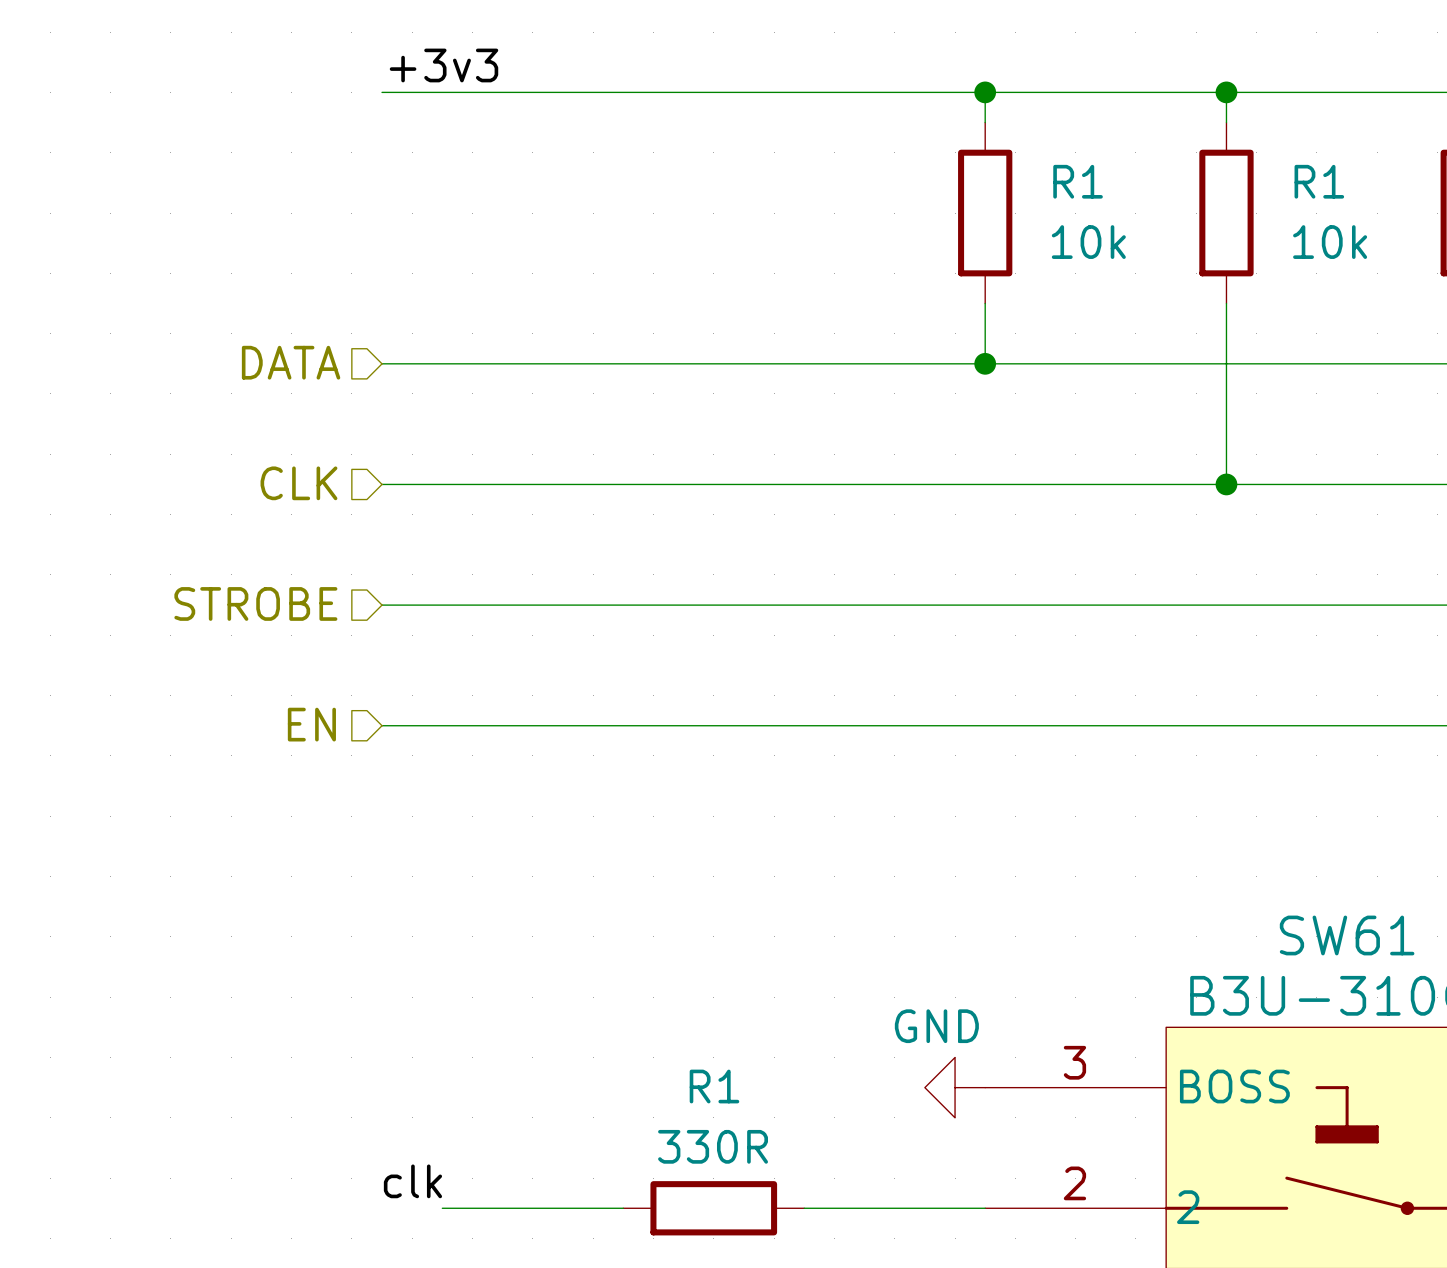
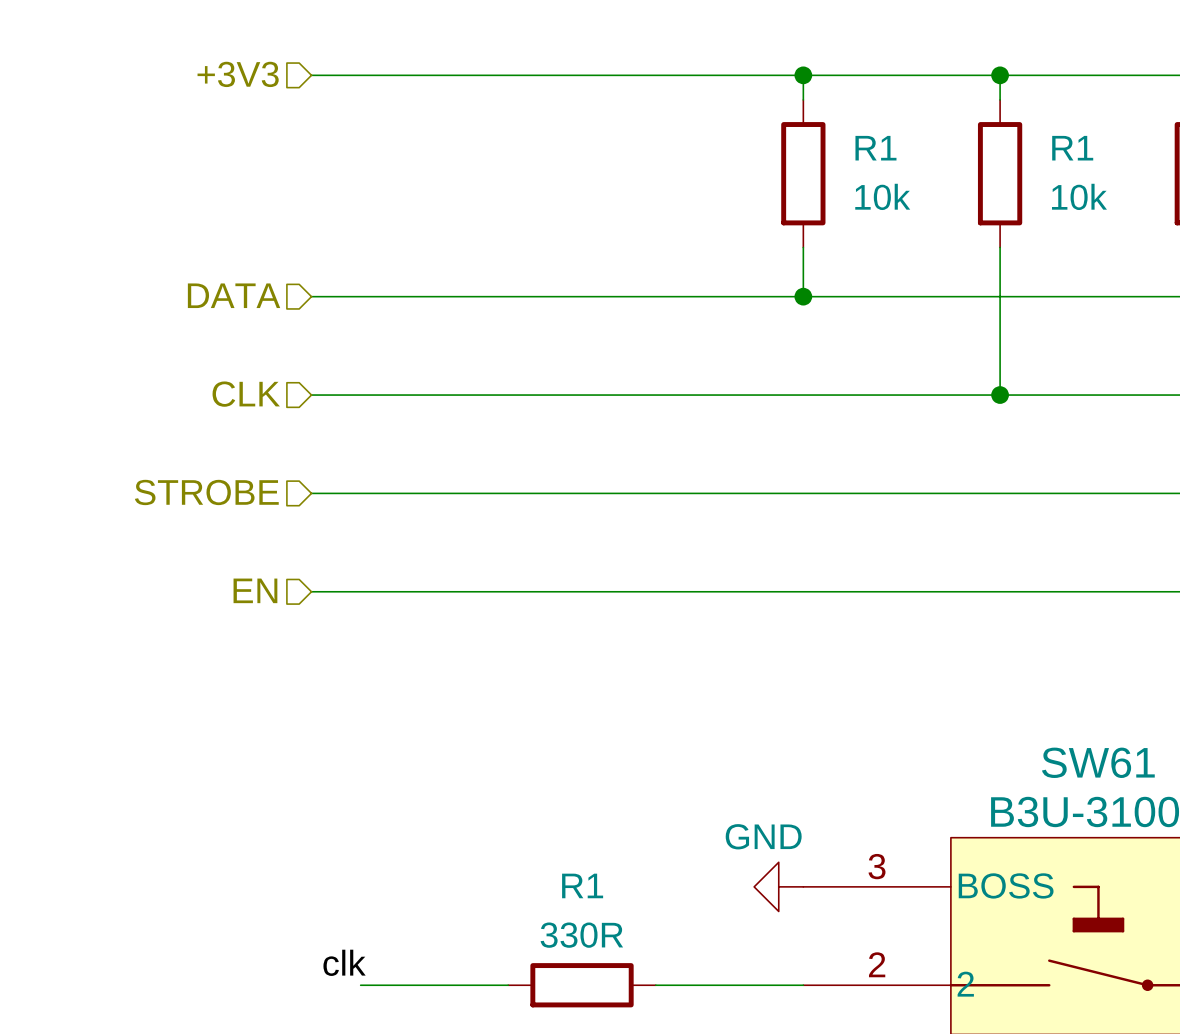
label: +3v3 (443, 65) -> none
hierarchical label: none -> +3V3 (238, 74)

